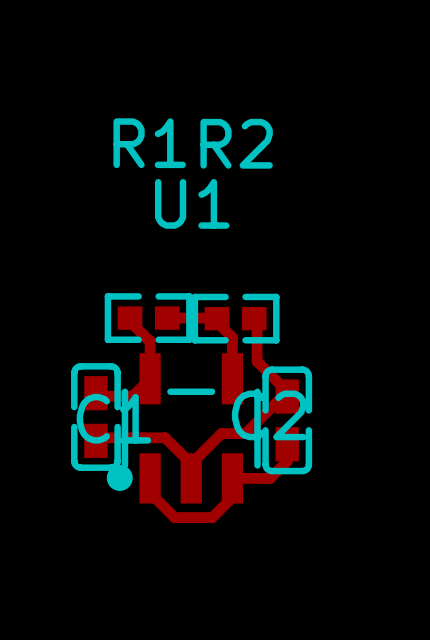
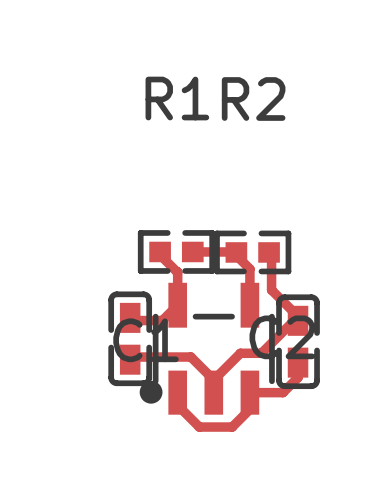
U1 name: U1 (192, 203) -> none

